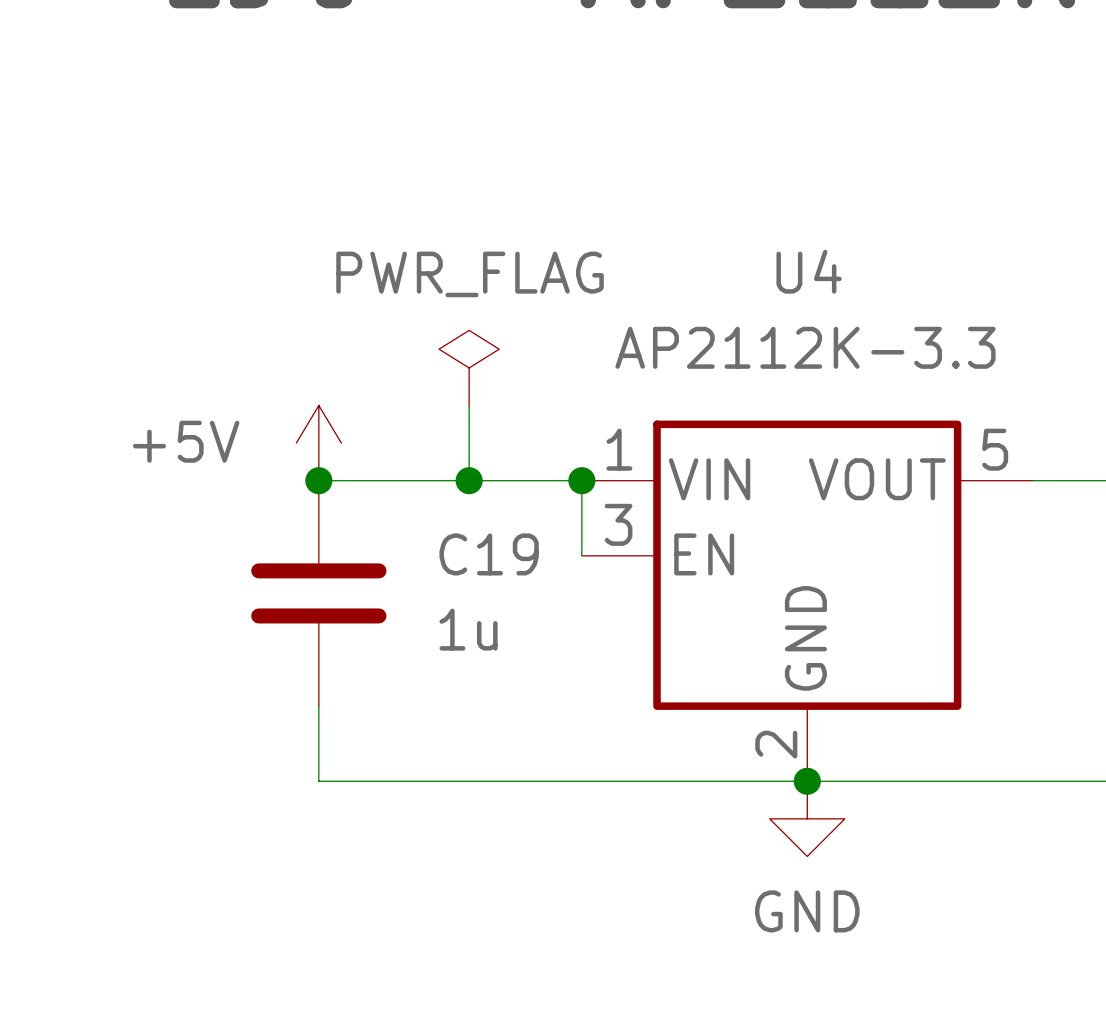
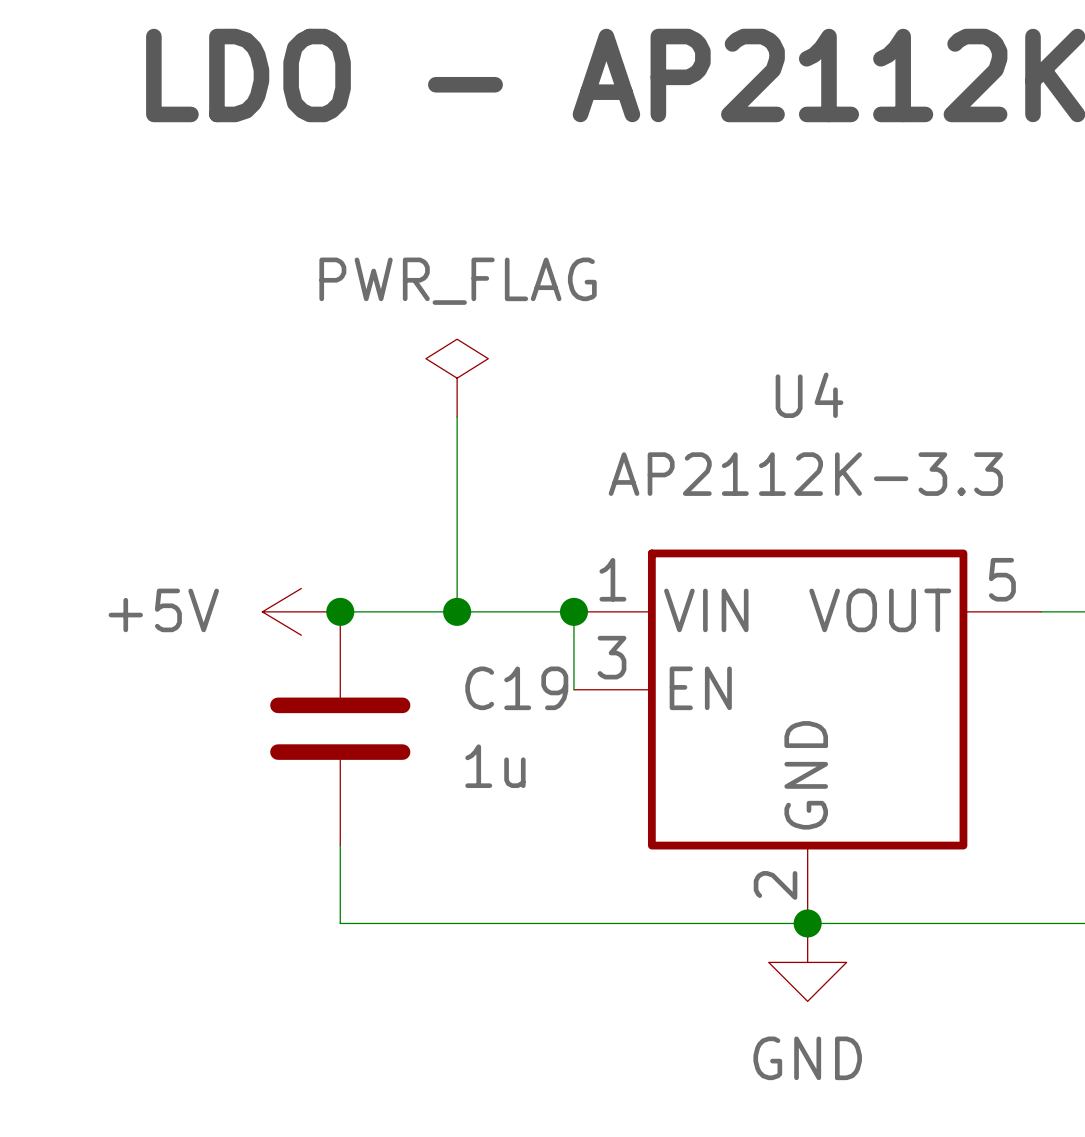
wire: none -> (457, 417) (457, 533)
power symbol position: PWR_FLAG (469, 367) -> PWR_FLAG (457, 378)
power symbol rotation: 0° (318, 443) -> 90° counterclockwise (301, 611)
junction position: (318, 480) -> (340, 611)
C19 position: (318, 593) -> (340, 728)
wire: (318, 706) (318, 781) (356, 781) -> (340, 845) (340, 923)

